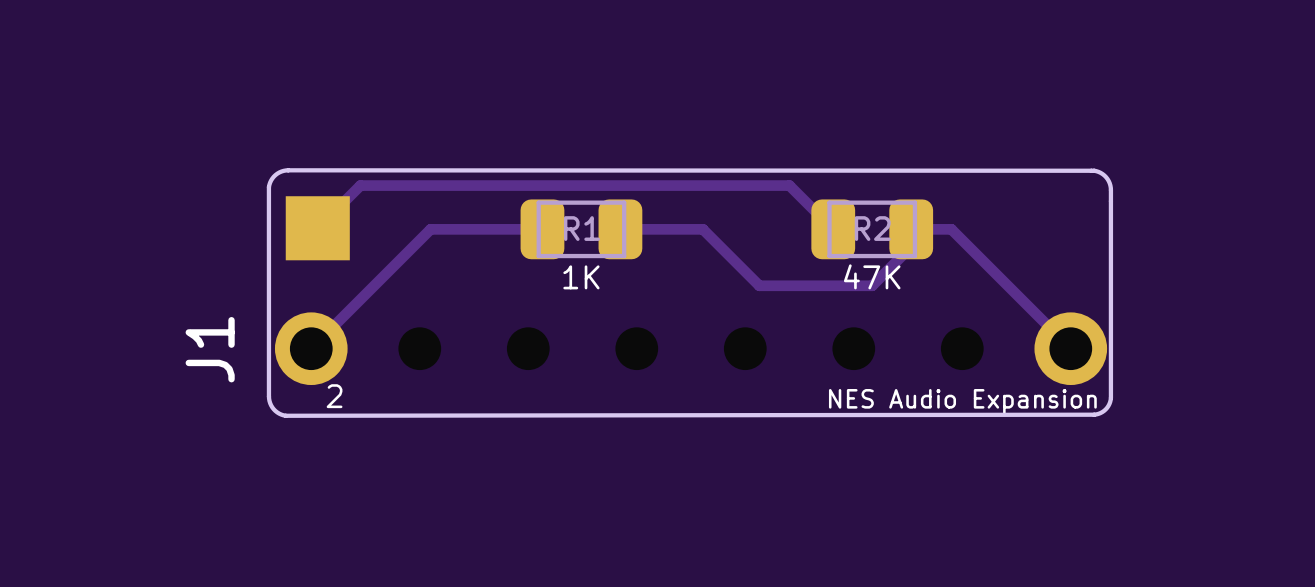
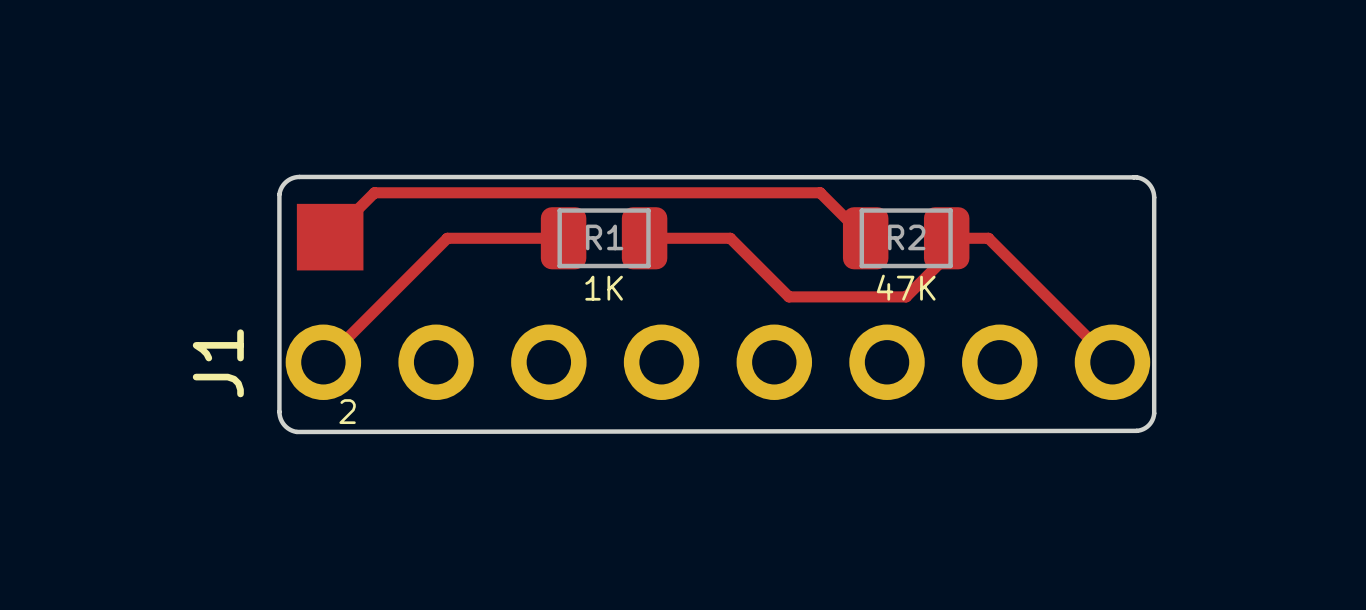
J1 footprint: [274, 312, 1108, 386] -> [285, 324, 1151, 401]
text: NES Audio Expansion (962, 401) -> none

